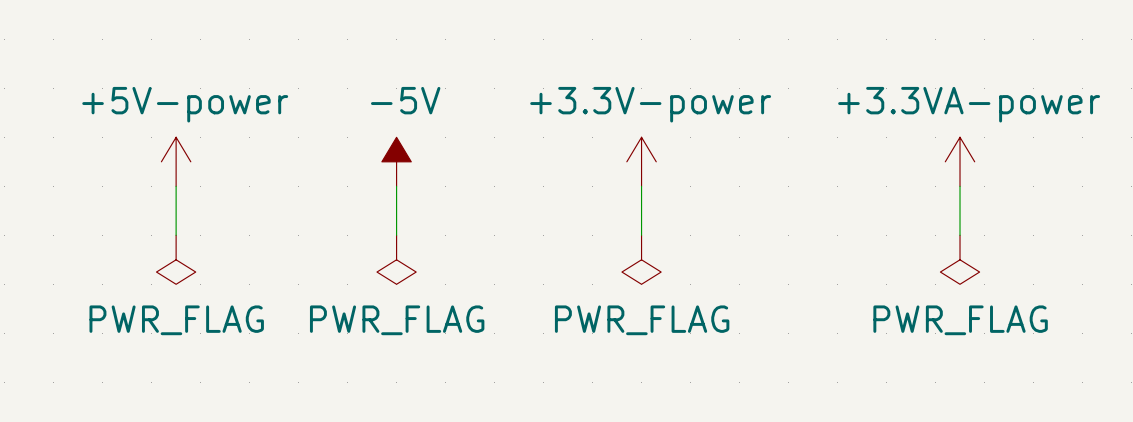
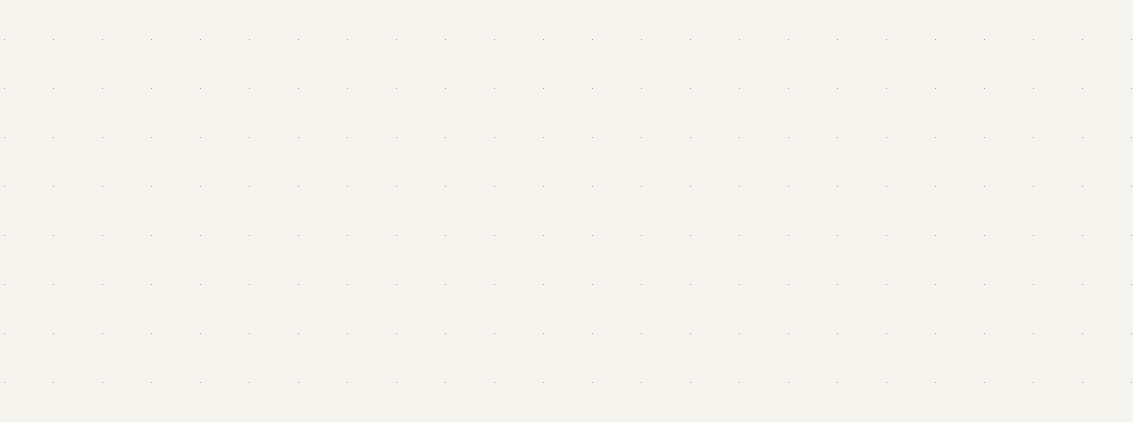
power symbol: +5V-power (176, 161) -> none
power symbol: -5V (396, 161) -> none
power symbol: +3.3V-power (641, 161) -> none
power symbol: +3.3VA-power (960, 161) -> none
wire: (176, 186) (176, 235) -> none
wire: (396, 186) (396, 235) -> none
wire: (641, 186) (641, 235) -> none
wire: (960, 186) (960, 235) -> none
power symbol: PWR_FLAG (176, 259) -> none
power symbol: PWR_FLAG (396, 259) -> none
power symbol: PWR_FLAG (641, 259) -> none
power symbol: PWR_FLAG (960, 259) -> none

